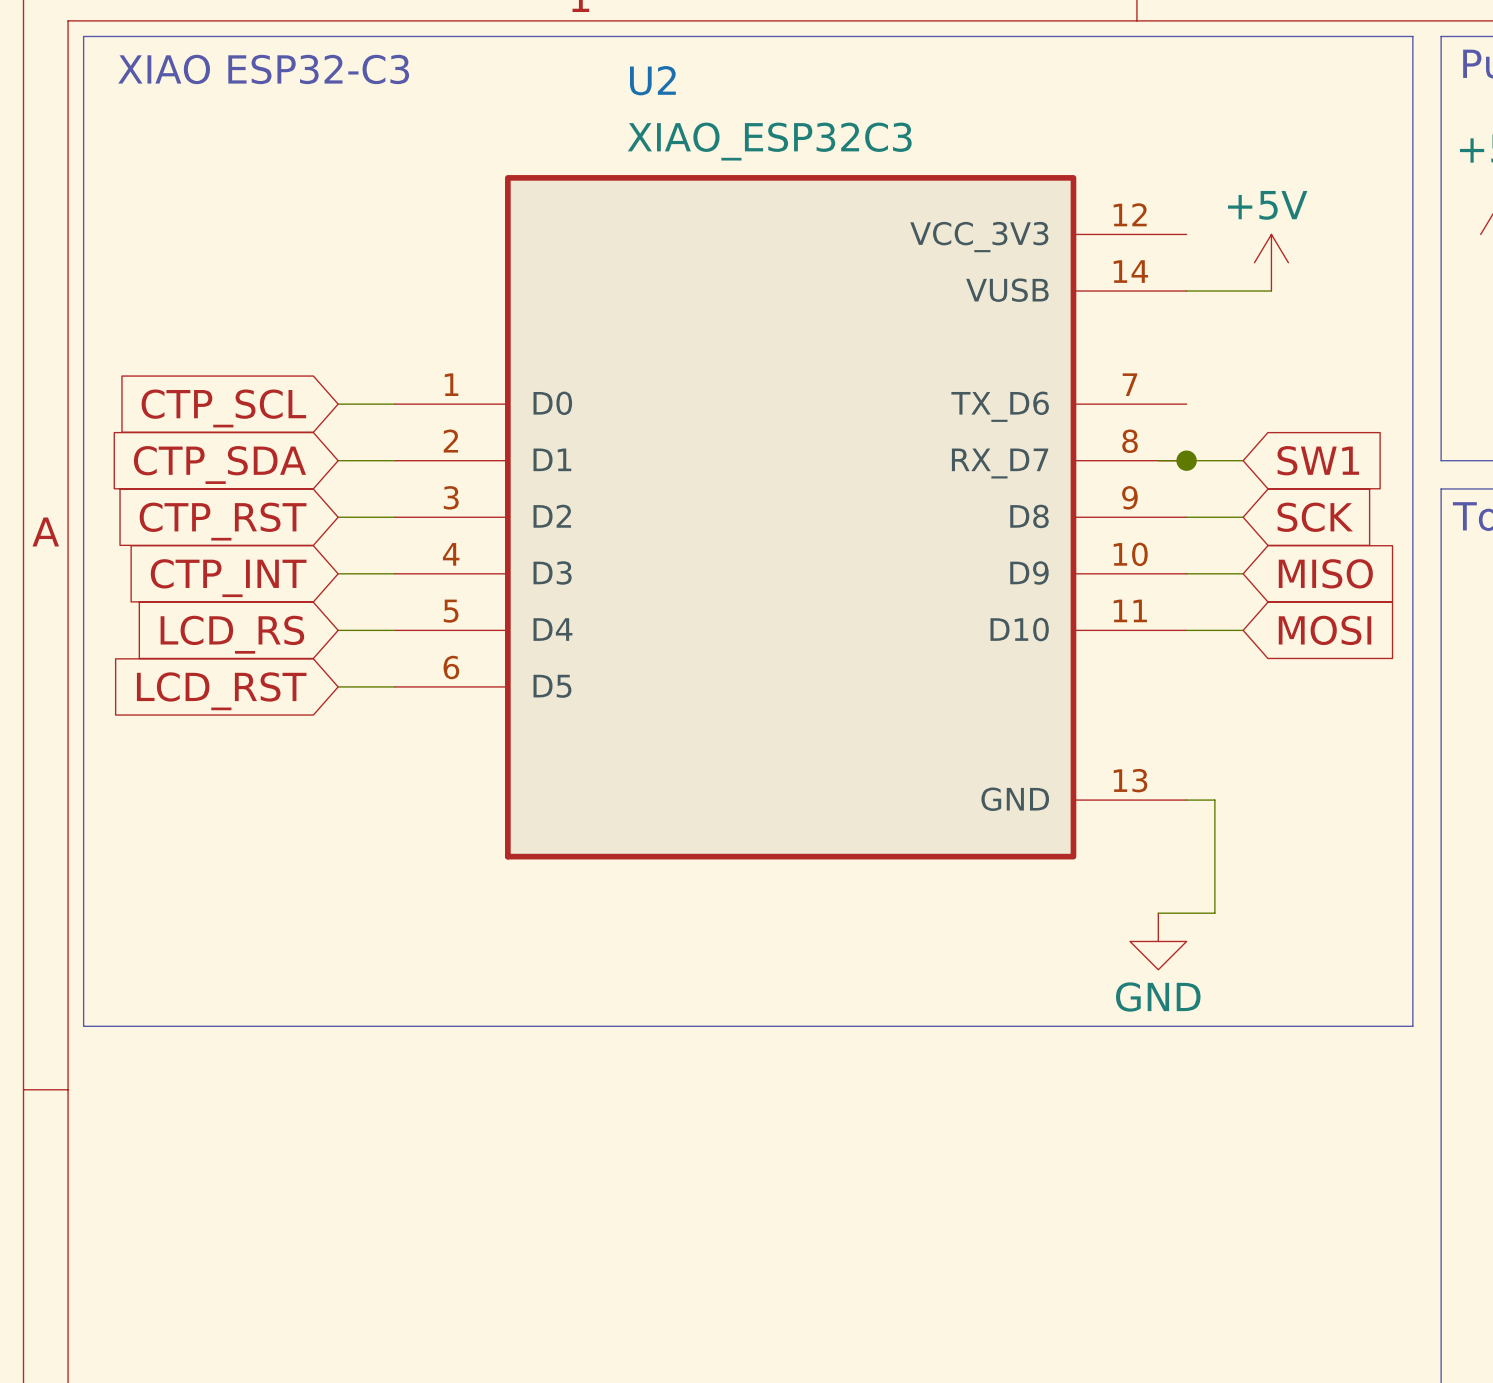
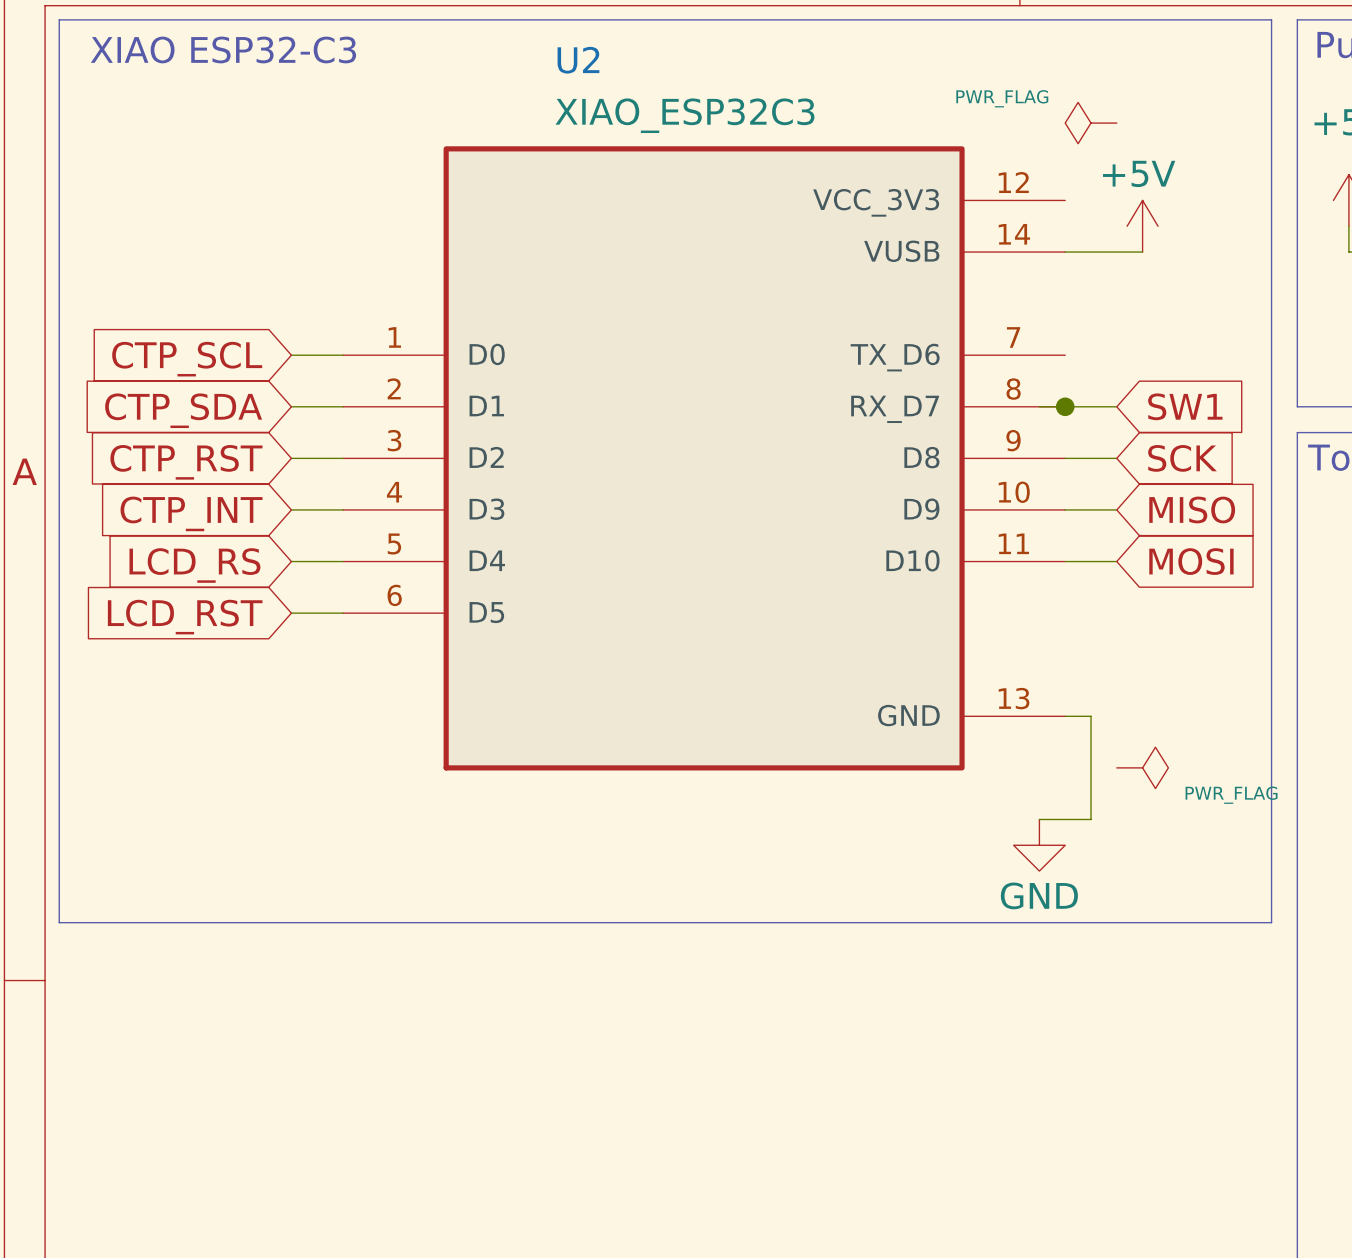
power symbol: none -> PWR_FLAG (1091, 123)
power symbol: none -> PWR_FLAG (1142, 767)

